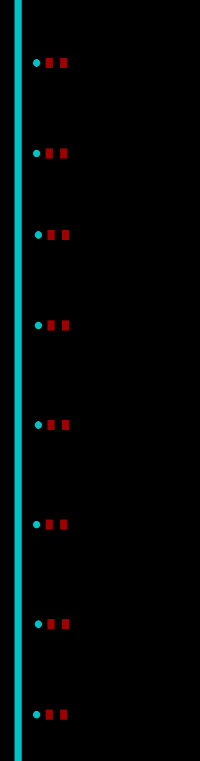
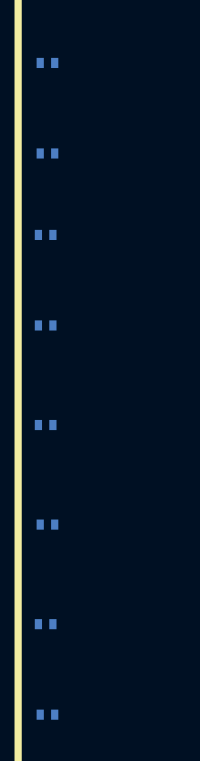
part side: top (50, 62) -> bottom (47, 62)
part side: top (50, 153) -> bottom (47, 153)
part side: top (51, 234) -> bottom (45, 234)
part side: top (51, 325) -> bottom (45, 325)
part side: top (51, 425) -> bottom (45, 425)
part side: top (50, 524) -> bottom (47, 524)
part side: top (51, 624) -> bottom (45, 624)
part side: top (50, 714) -> bottom (47, 714)

